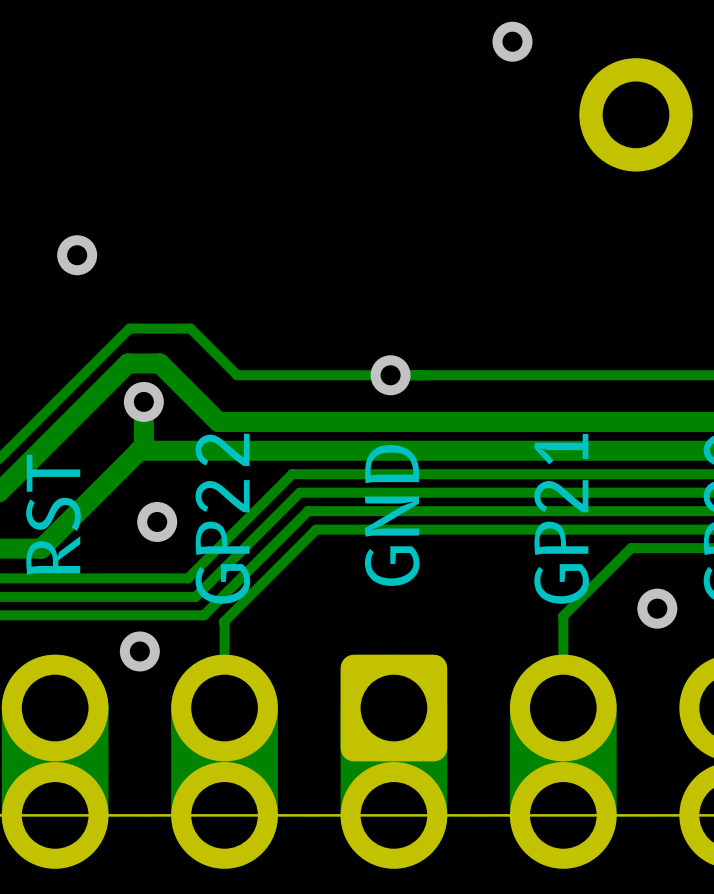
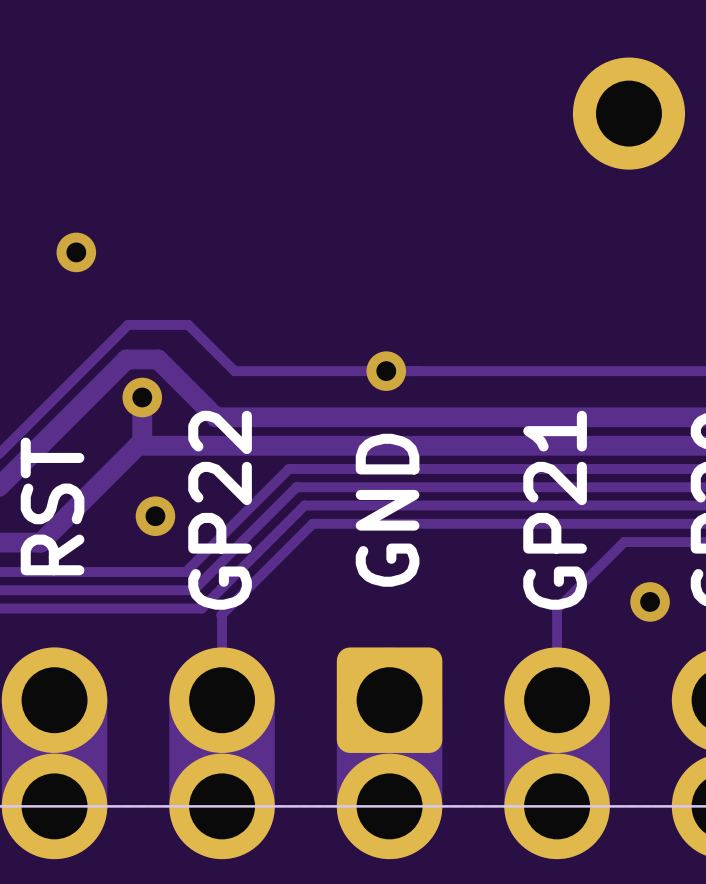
via: (512, 41) -> none
via: (139, 651) -> none

